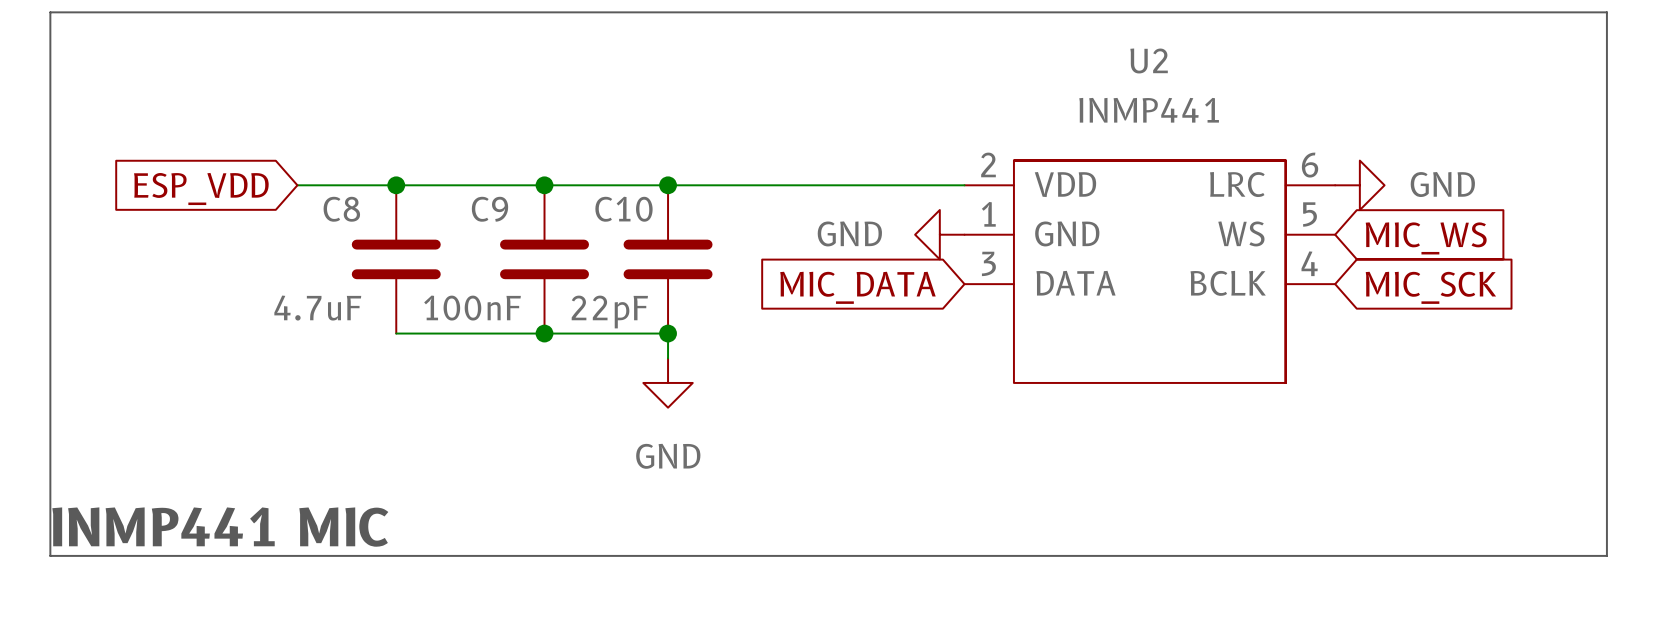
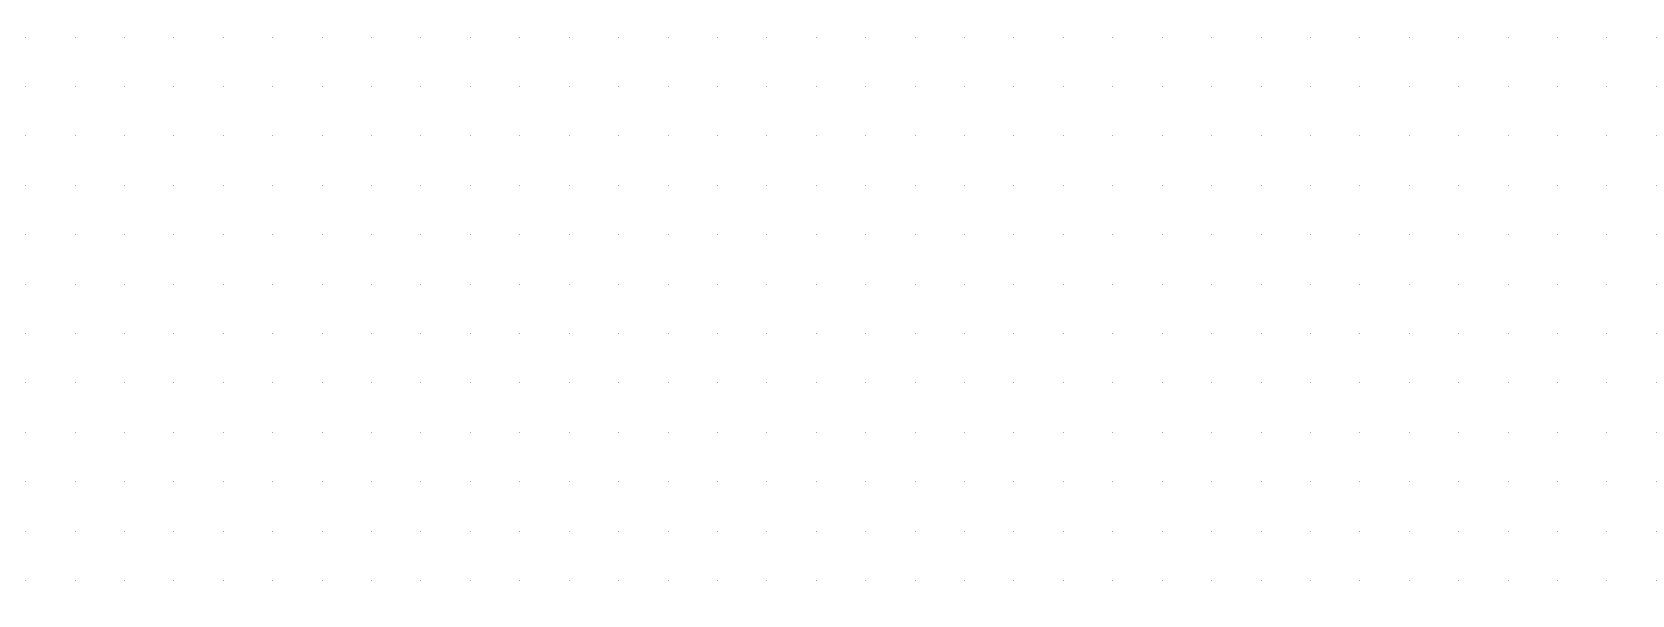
line: (50, 12) (50, 555) (1606, 555) (1606, 12) (50, 12) -> none
wire: (297, 185) (964, 185) -> none
junction: (396, 185) -> none
junction: (544, 185) -> none
junction: (668, 185) -> none
power symbol: GND (1359, 185) -> none
global label: ESP_VDD (201, 189) -> none
power symbol: GND (939, 234) -> none
global label: MIC_WS (1426, 238) -> none
C8: 4.7uF (396, 259) -> none
C9: 100nF (544, 259) -> none
C10: 22pF (668, 259) -> none
U2: INMP441 (1149, 271) -> none
global label: MIC_DATA (857, 287) -> none
global label: MIC_SCK (1430, 287) -> none
wire: (396, 333) (668, 333) (668, 358) -> none
junction: (544, 333) -> none
junction: (668, 333) -> none
power symbol: GND (668, 382) -> none
text: INMP441 MIC (220, 527) -> none

